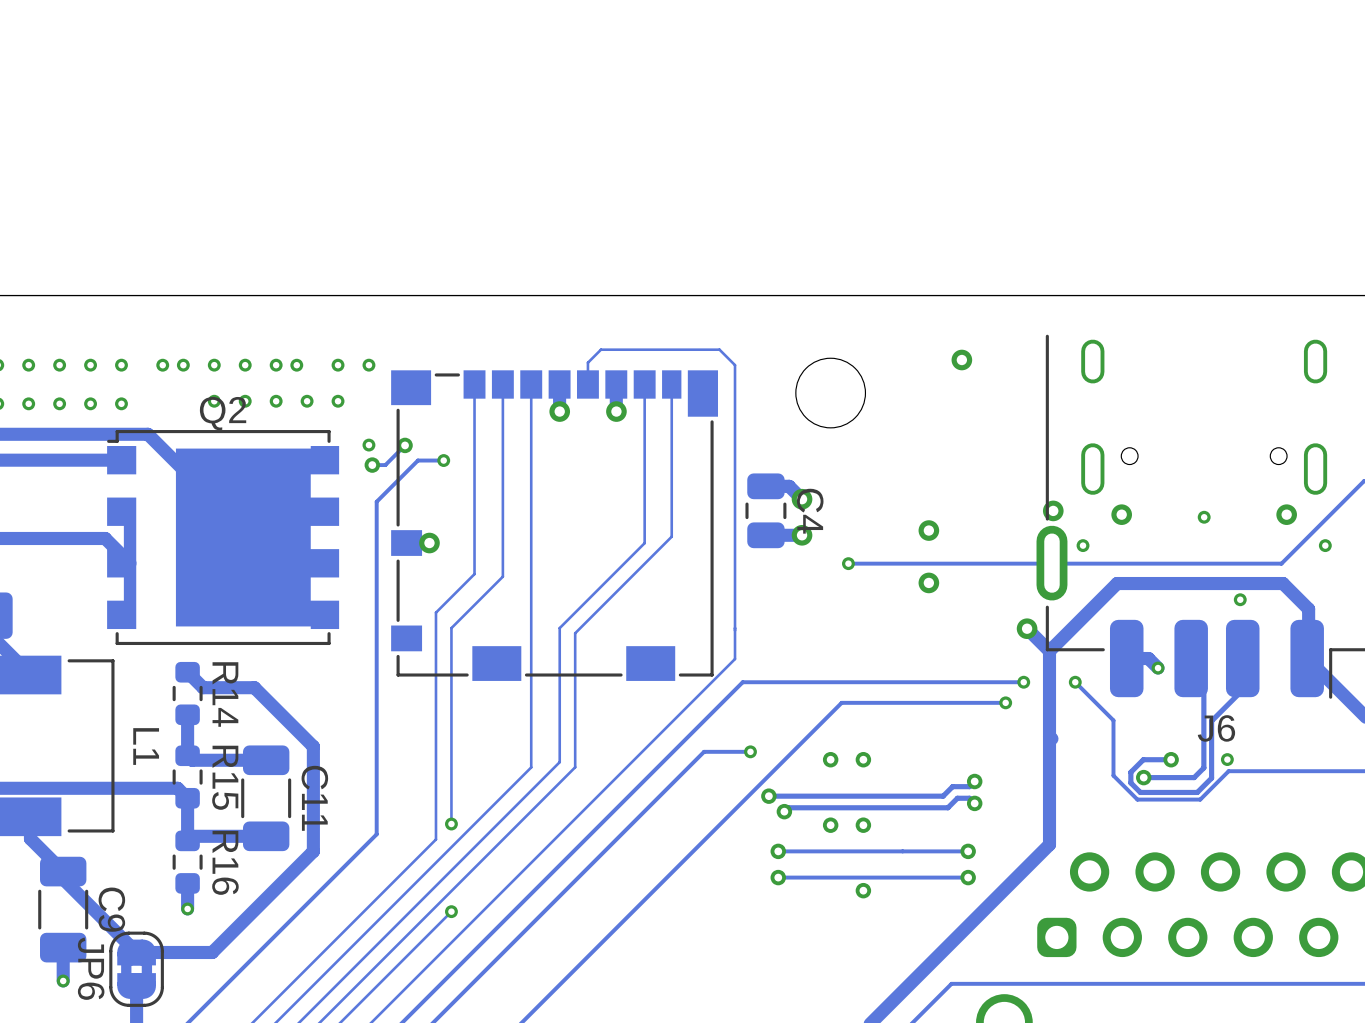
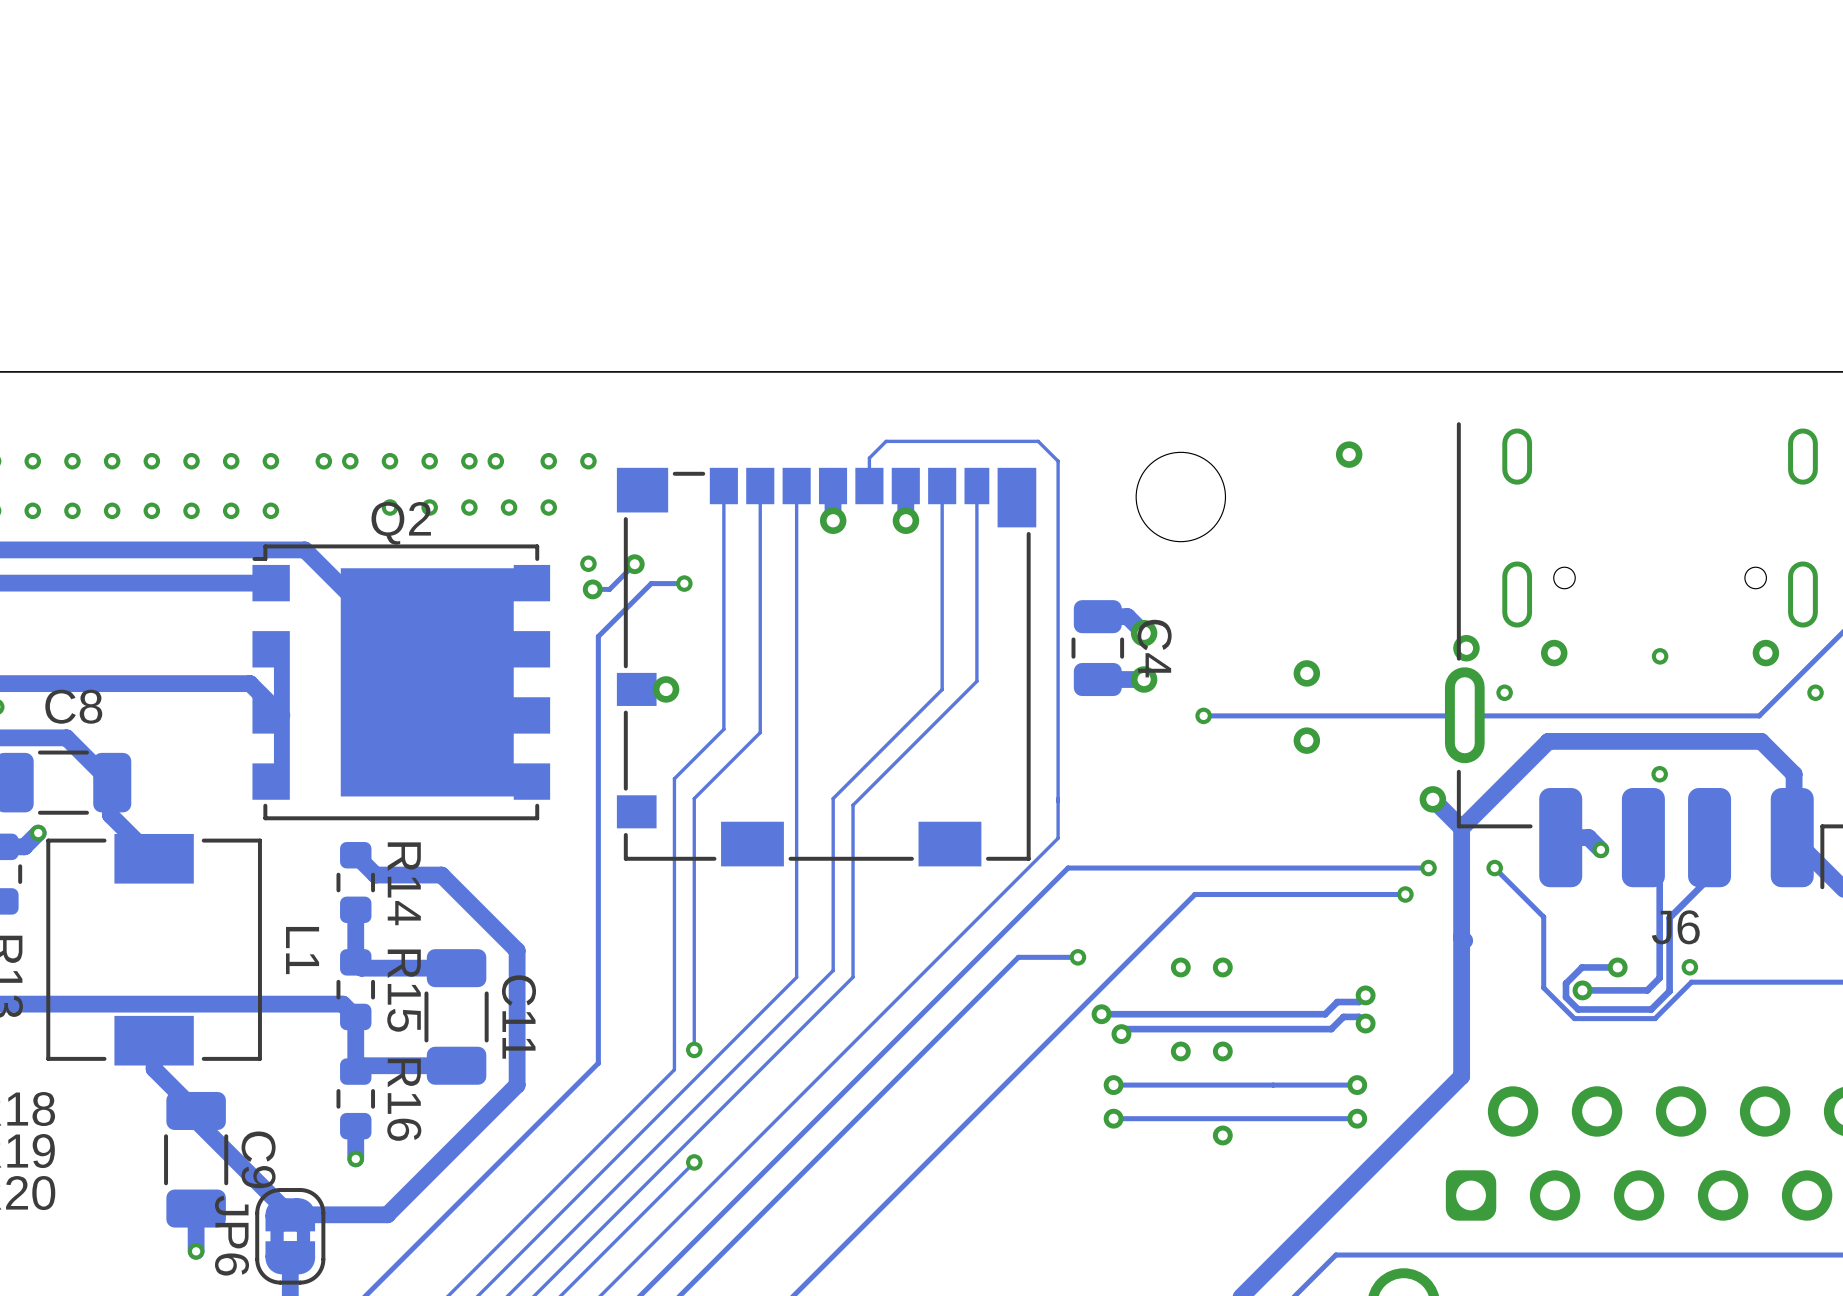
via position: (1240, 599) -> (1659, 774)

